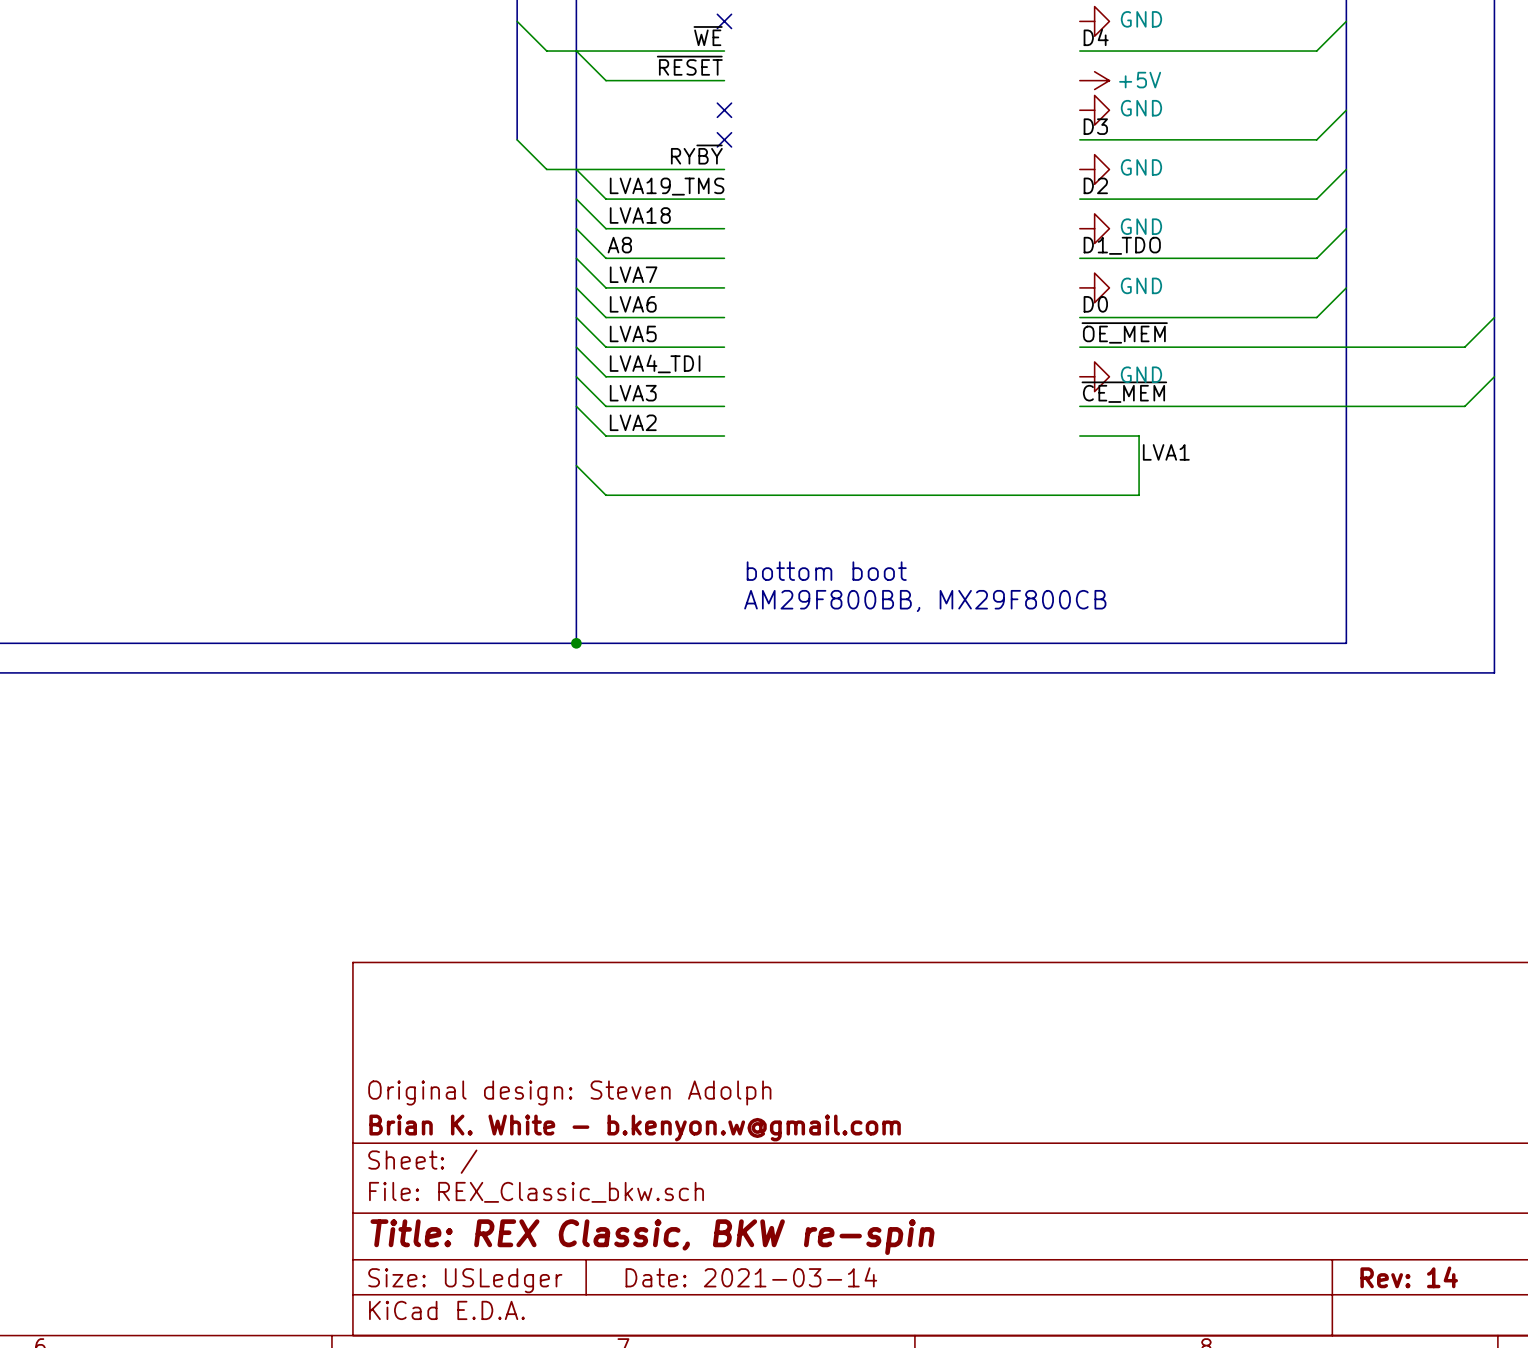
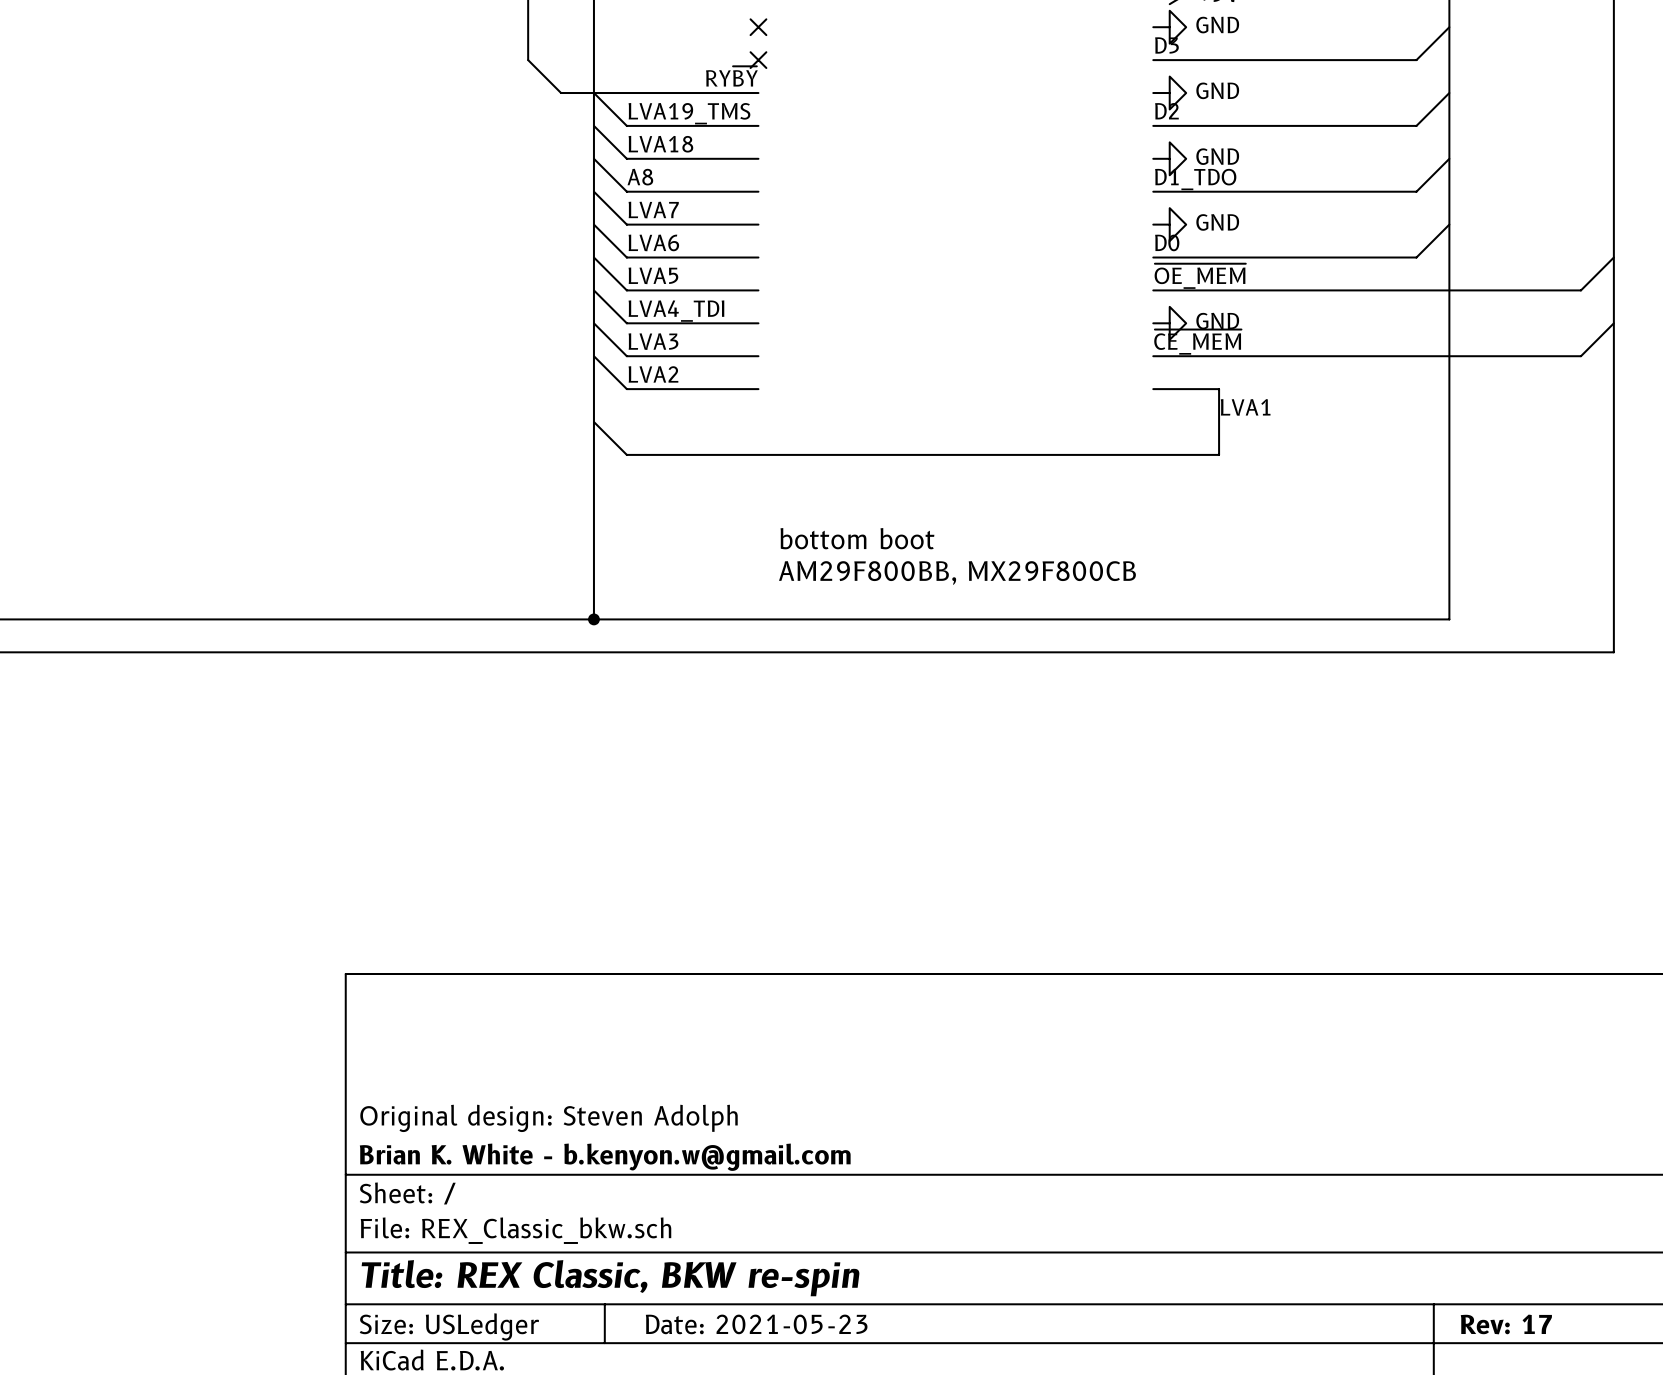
title block: Date: 2021-03-14 (751, 1277) -> Date: 2021-05-23 (756, 1324)
title block: Rev: 14 (1409, 1277) -> Rev: 17 (1506, 1324)

